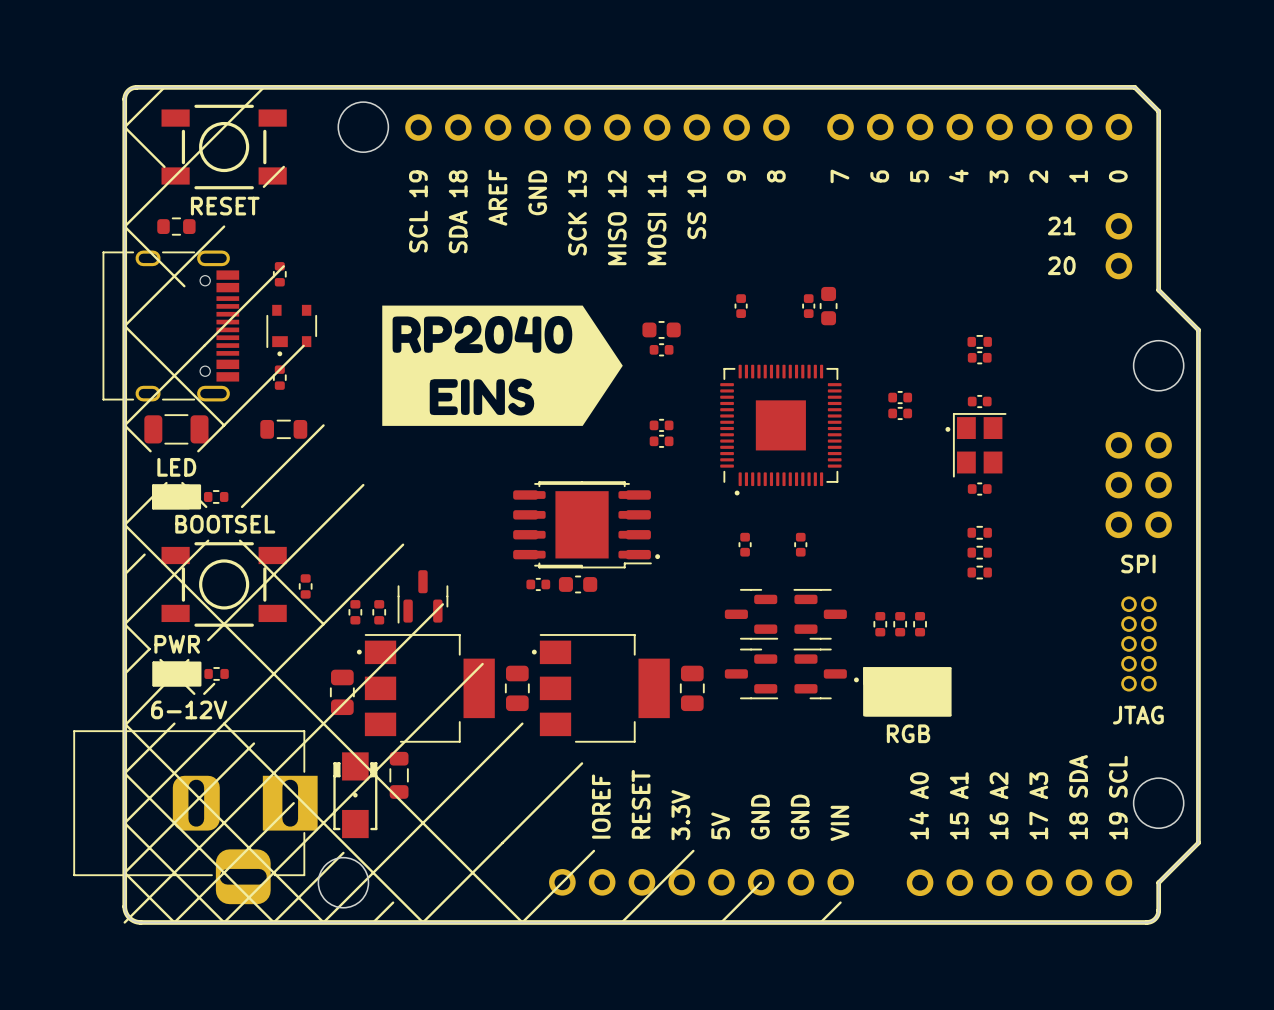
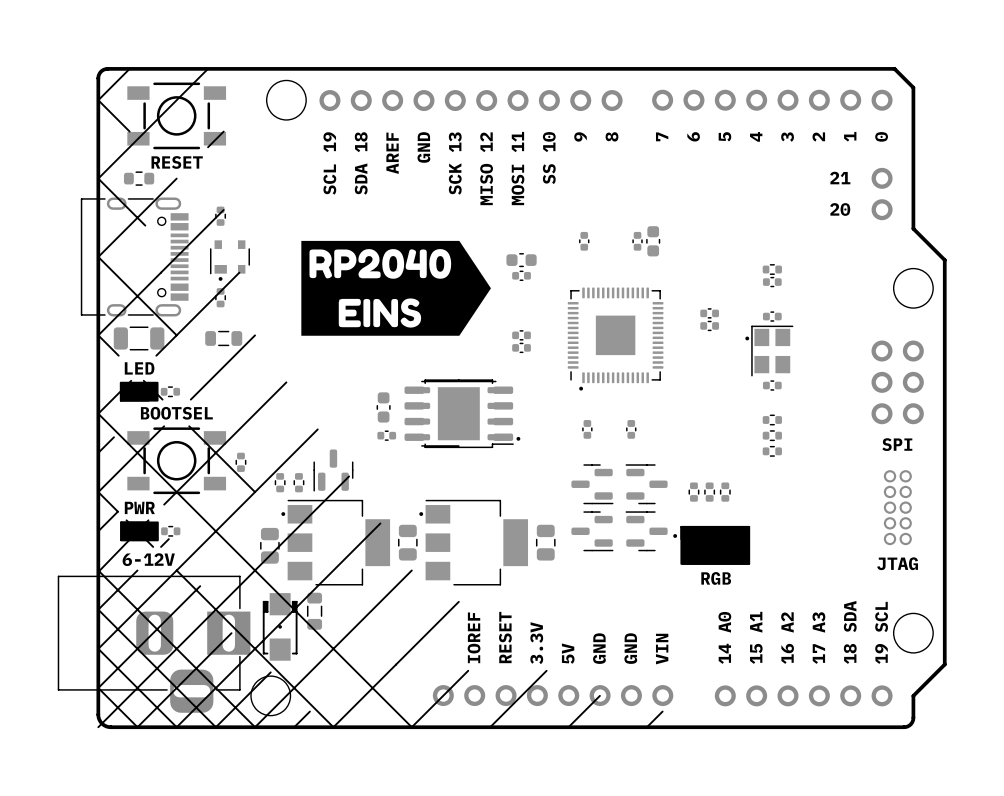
part position: (538, 584) -> (386, 435)
part rotation: 0° (578, 584) -> 90° clockwise (383, 407)
part position: (578, 584) -> (383, 407)

